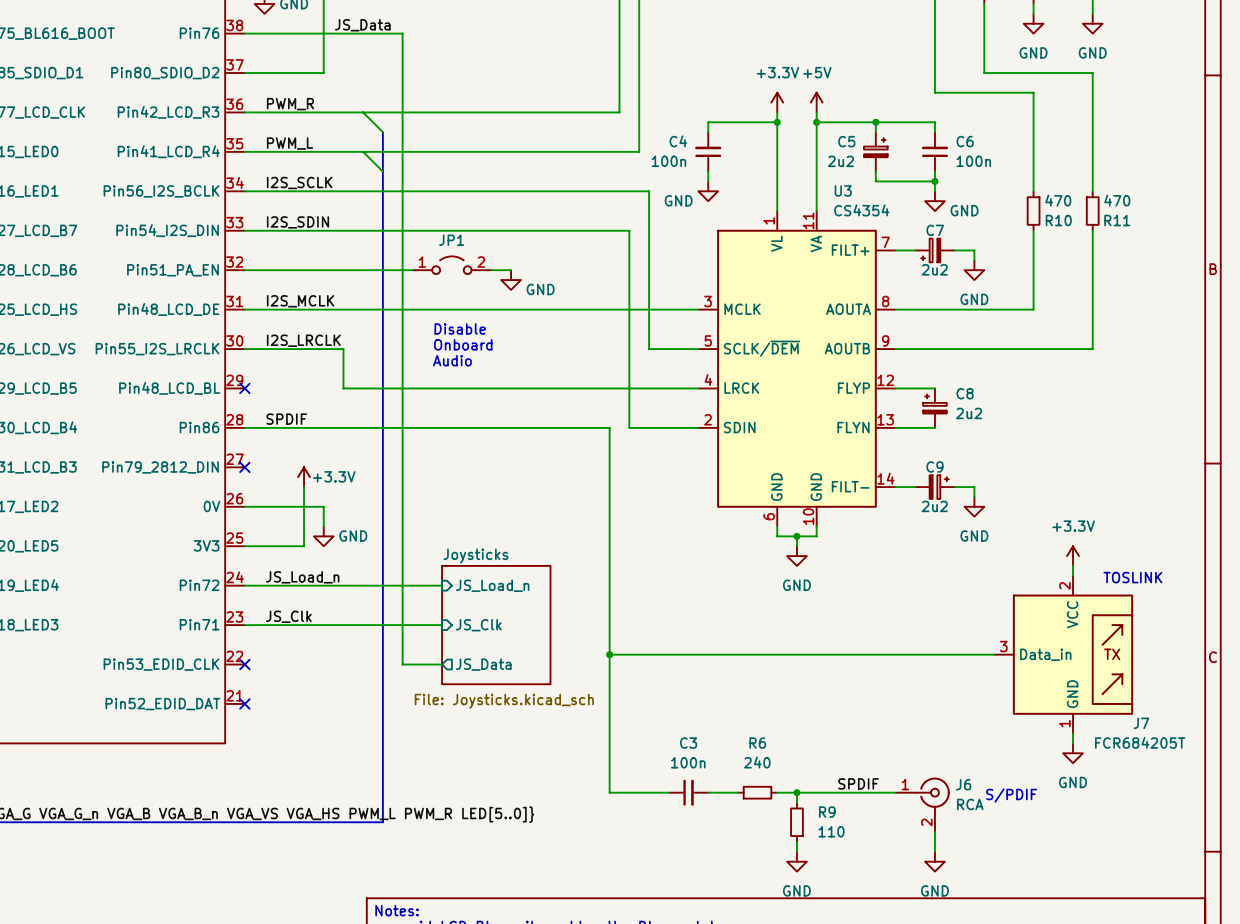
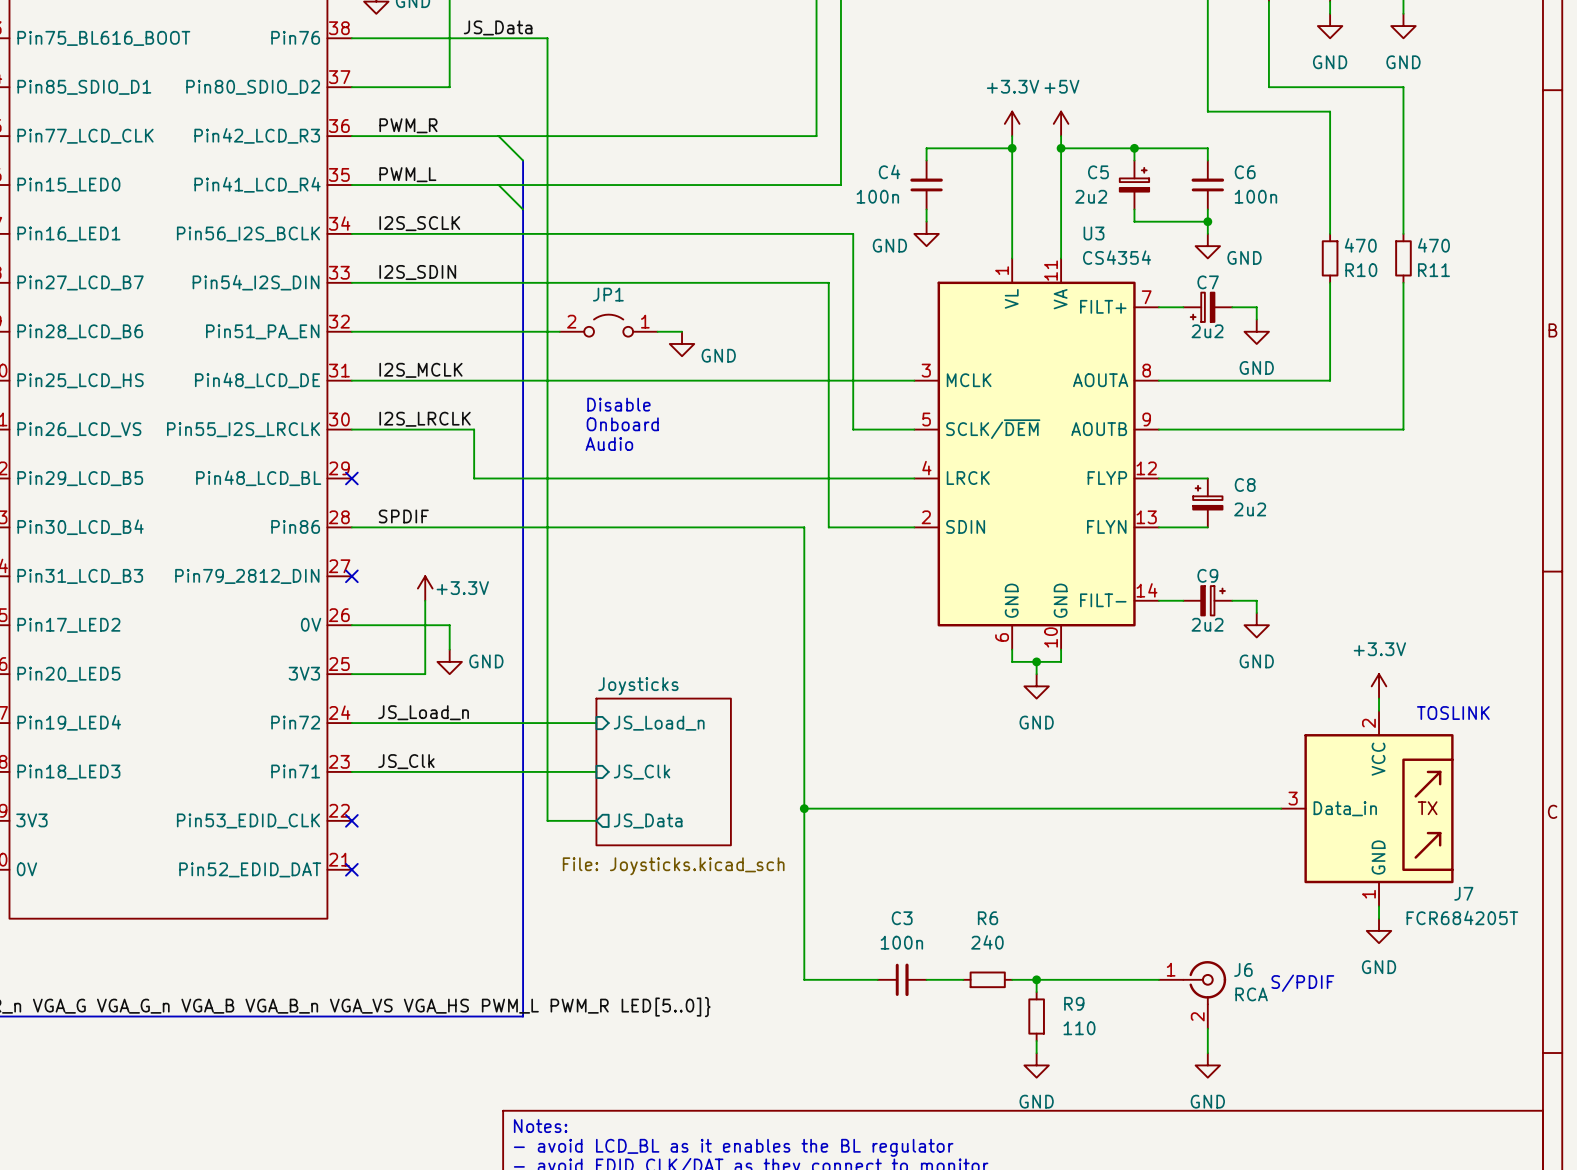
JP1 flip: as is (451, 265) -> left-right (608, 325)
label: SPDIF (858, 783) -> none

